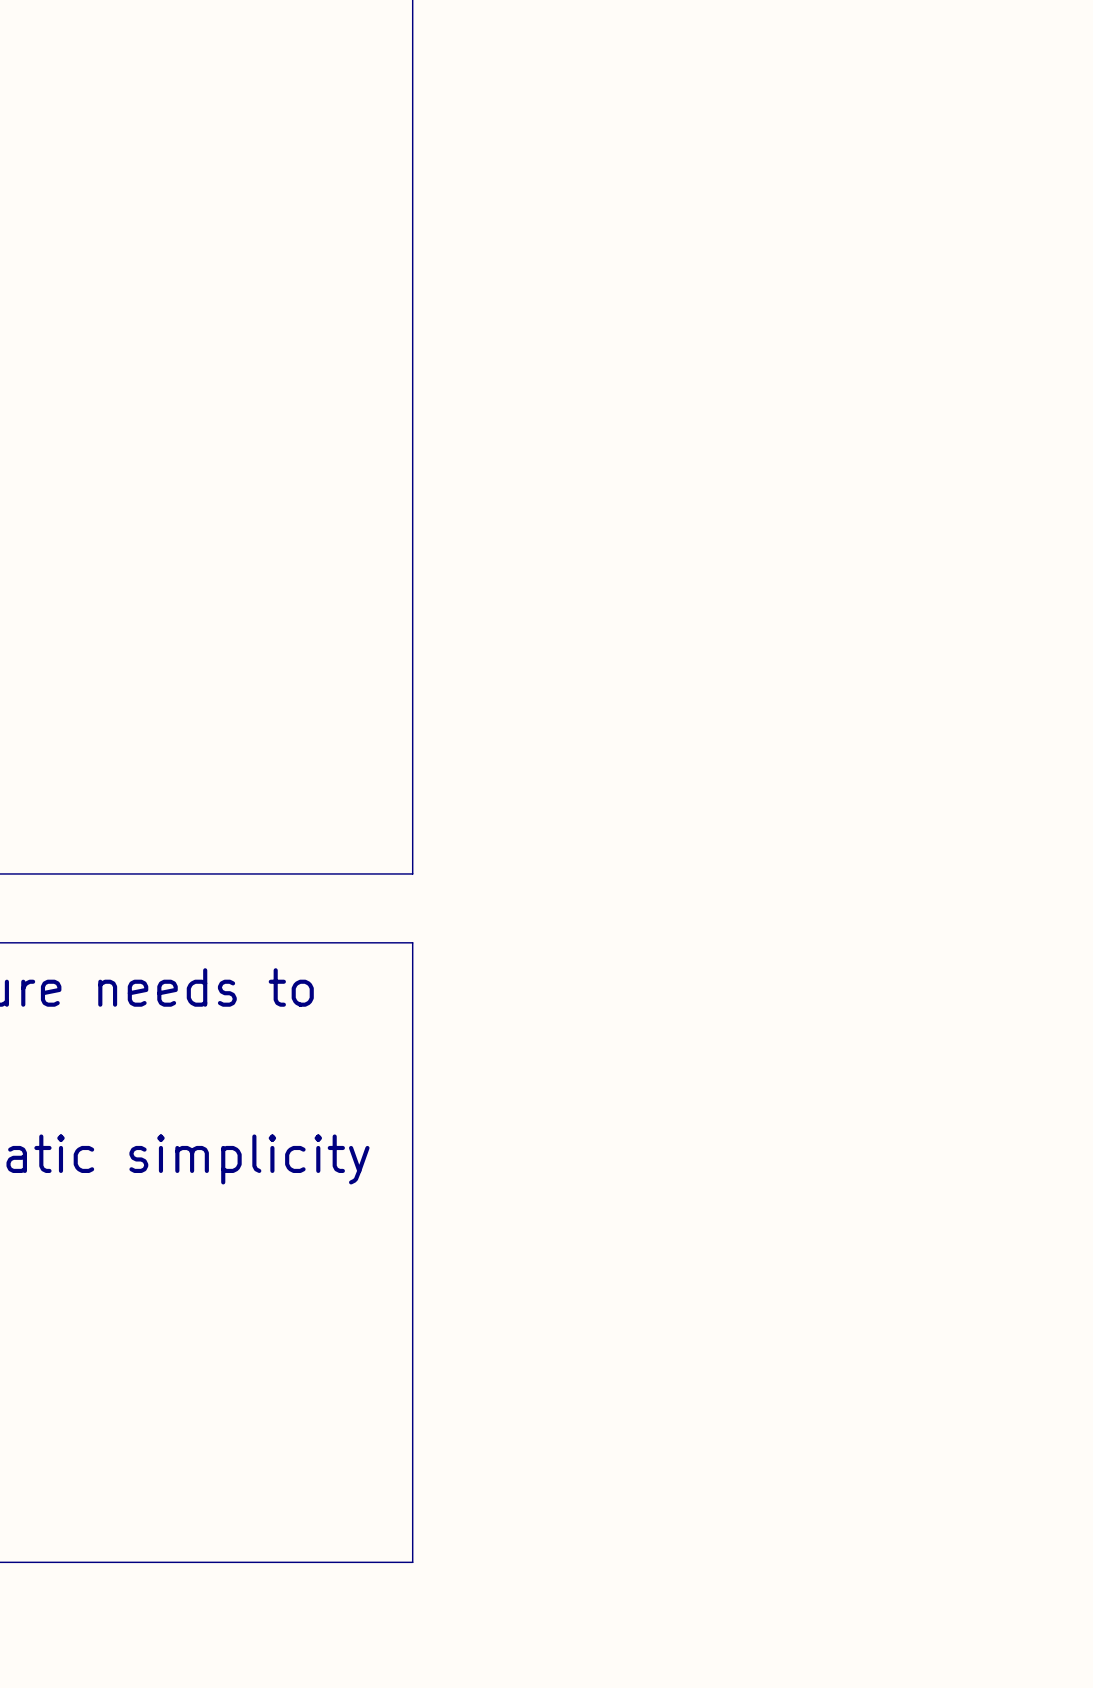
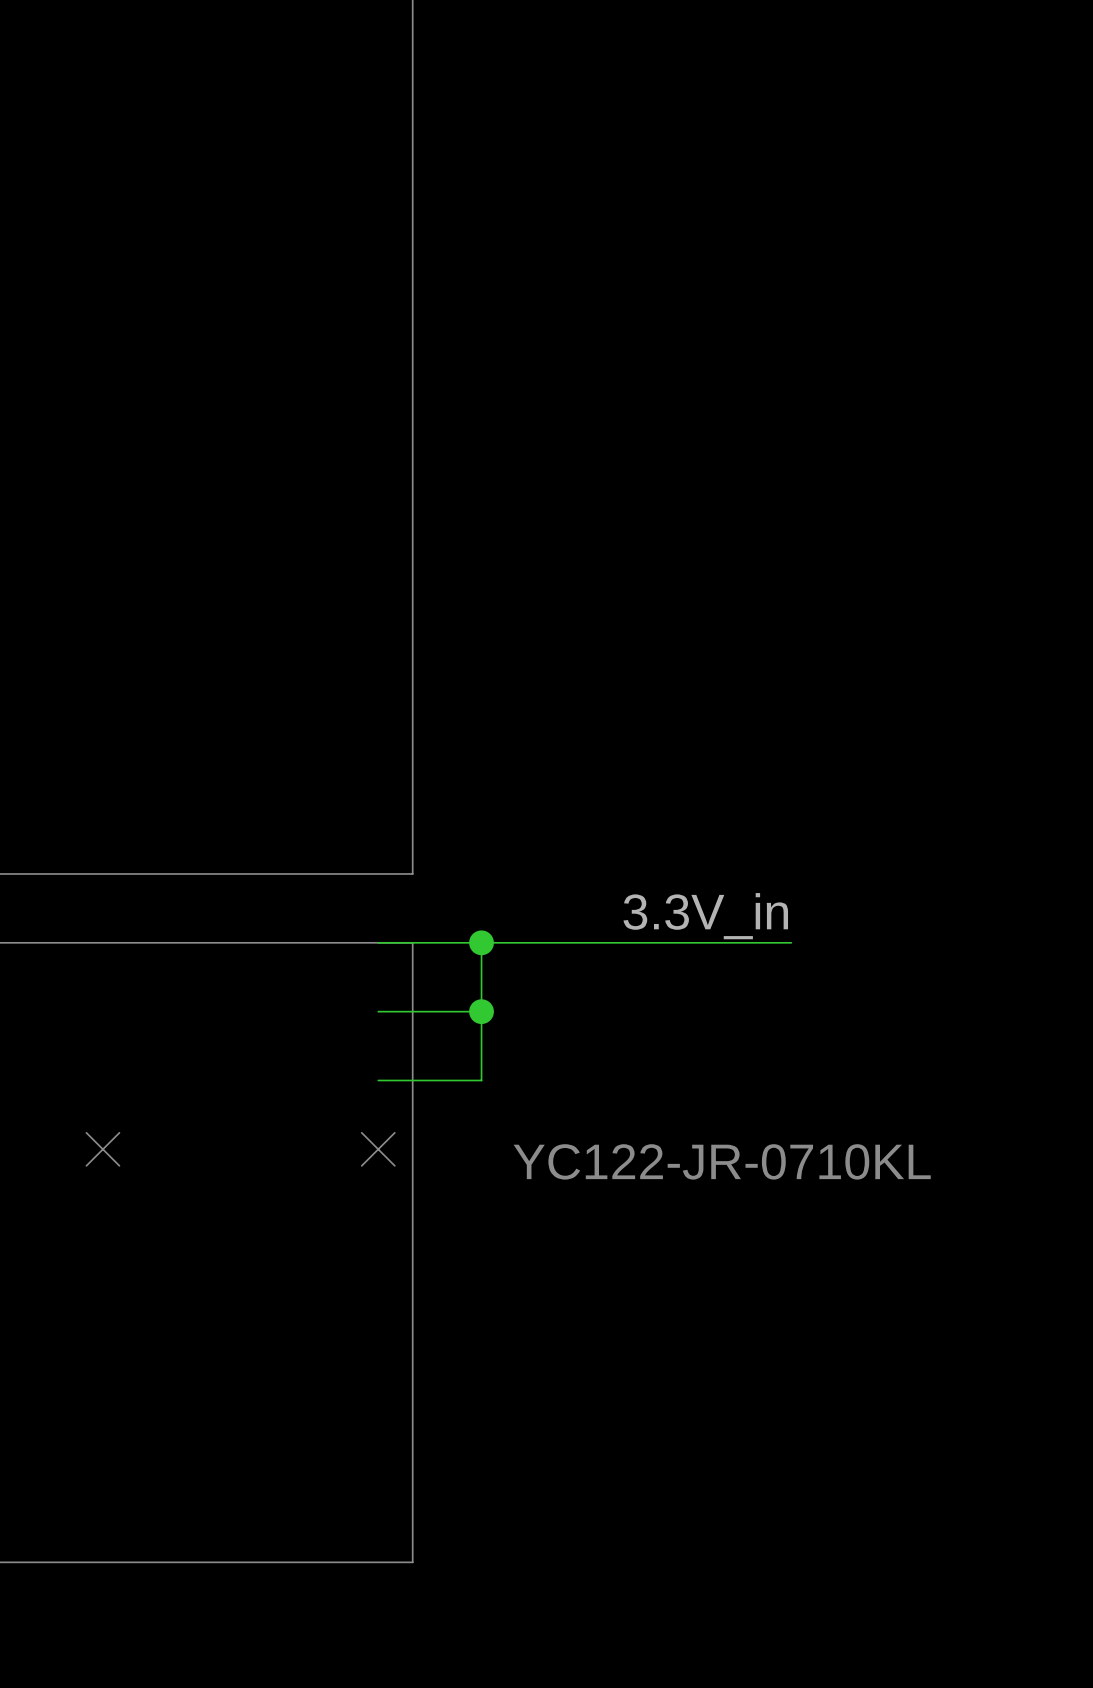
label: none -> 3.3V_in (705, 916)
wire: none -> (378, 942) (791, 942)
wire: none -> (481, 942) (481, 1080) (378, 1080)
junction: none -> (481, 942)
wire: none -> (378, 1011) (481, 1011)
junction: none -> (481, 1011)
no-connect mark: none -> (102, 1149)
no-connect mark: none -> (378, 1149)
text: none -> YC122-JR-0710KL (722, 1161)

